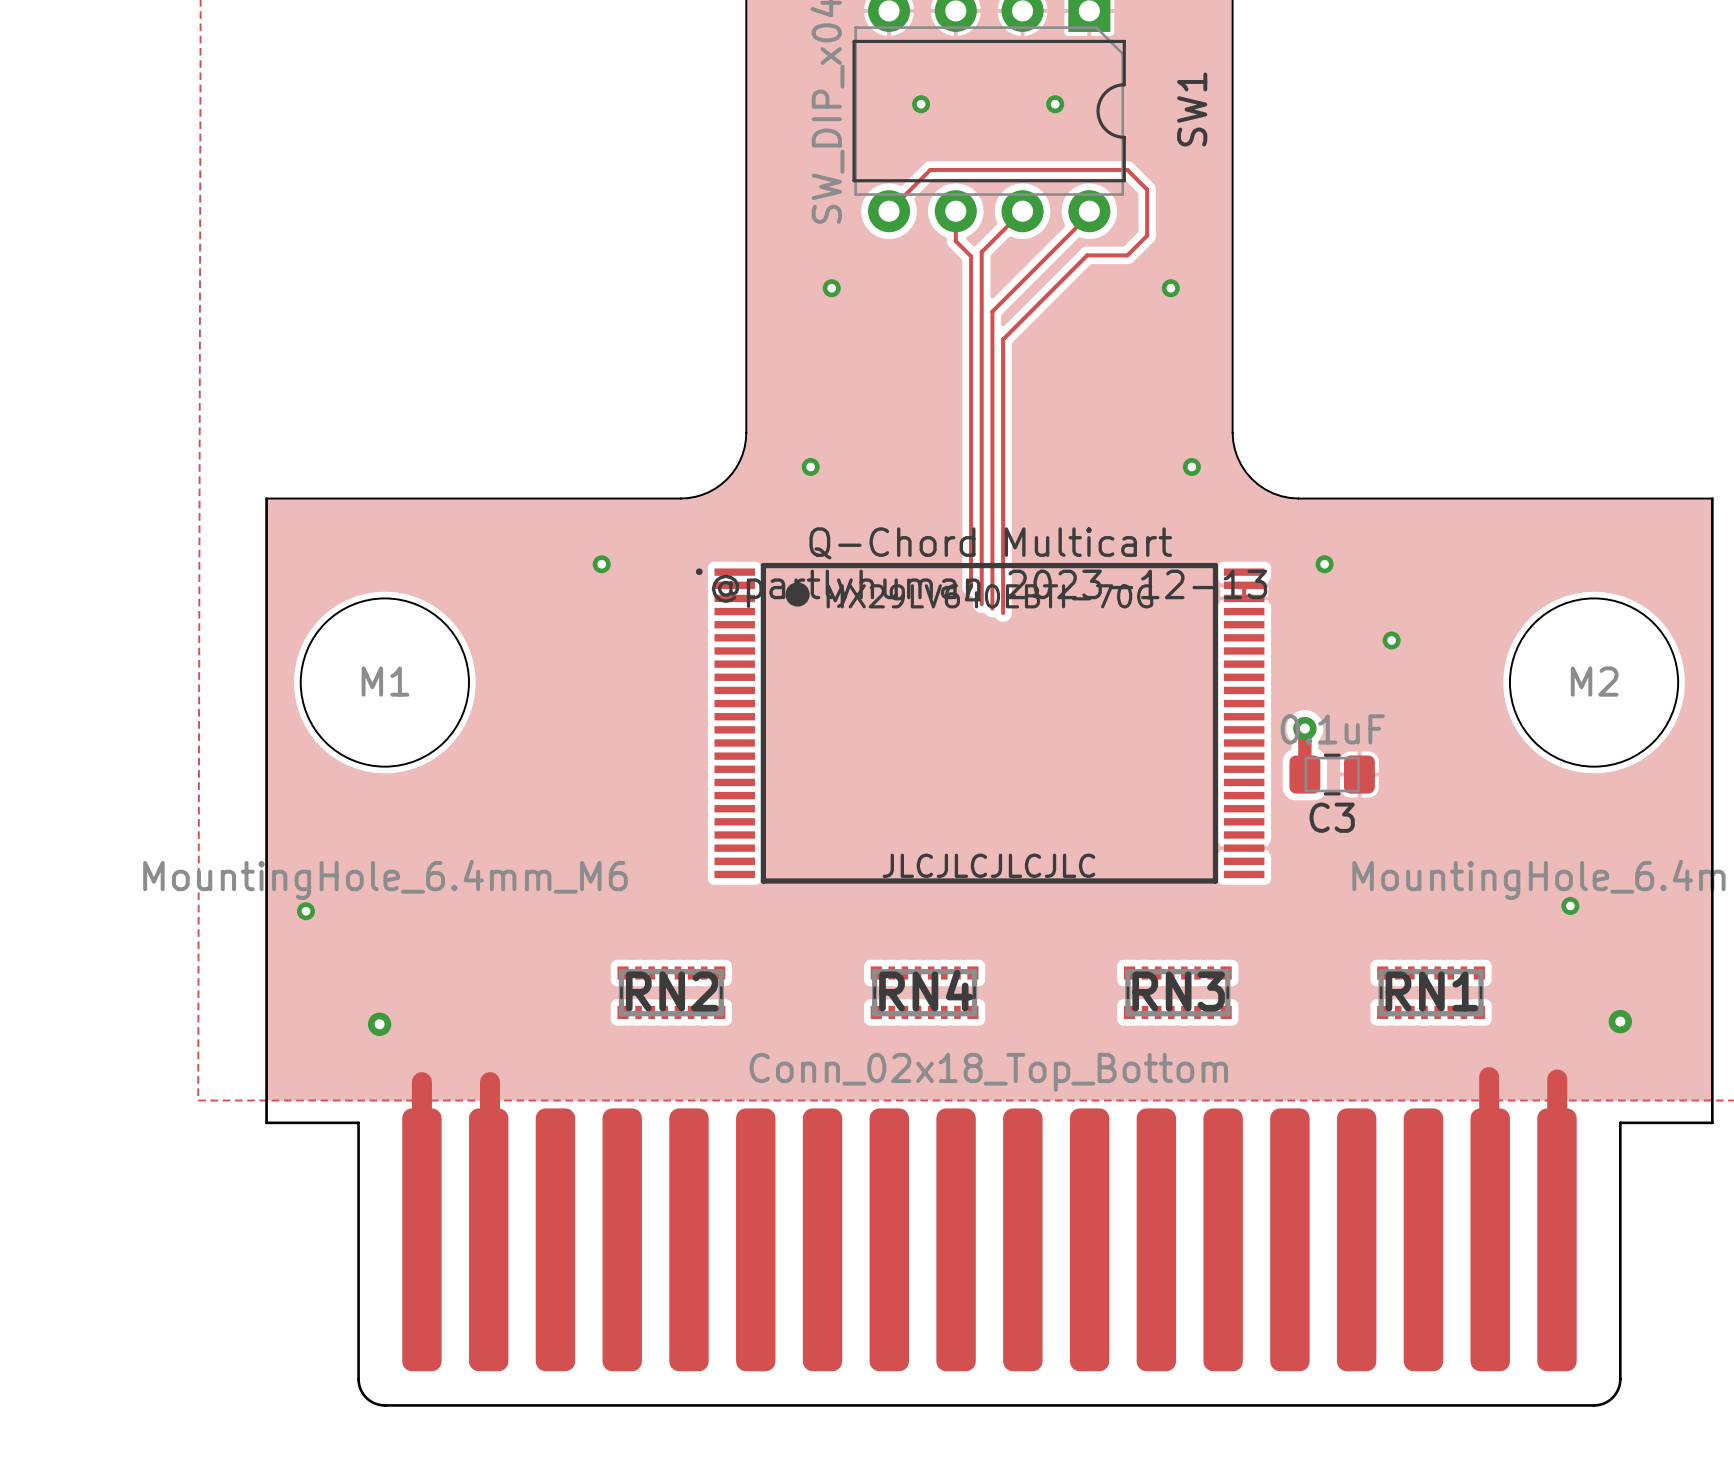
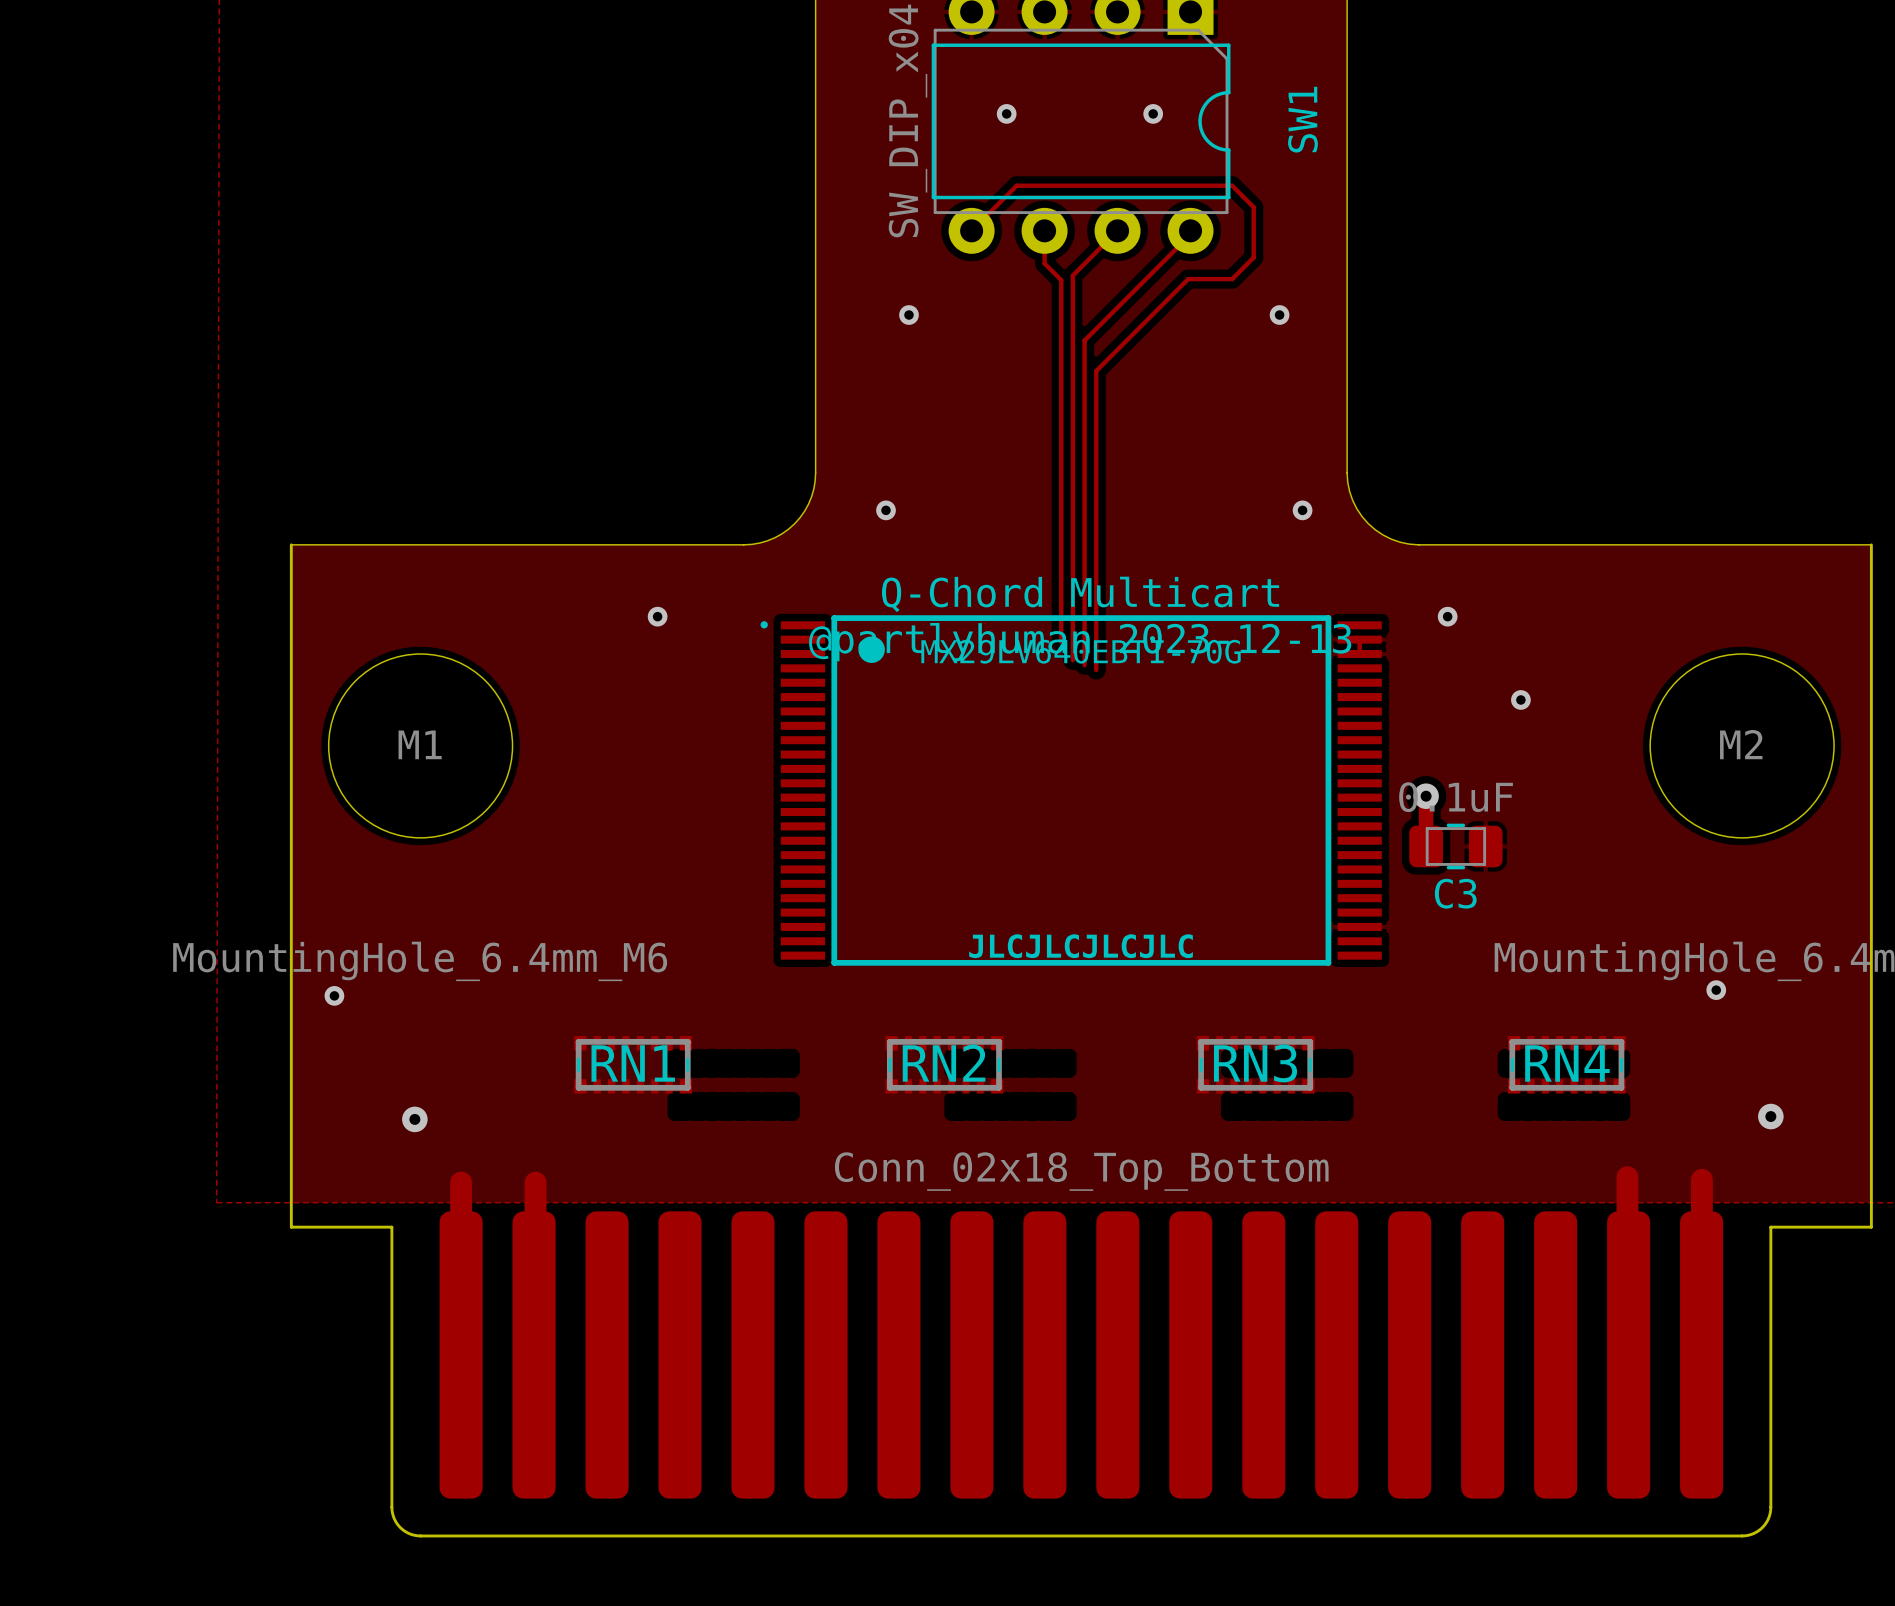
RN2 position: (671, 992) -> (944, 1064)
RN4 position: (924, 992) -> (1566, 1064)
RN3 position: (1177, 992) -> (1255, 1064)
RN1 position: (1431, 992) -> (633, 1064)

